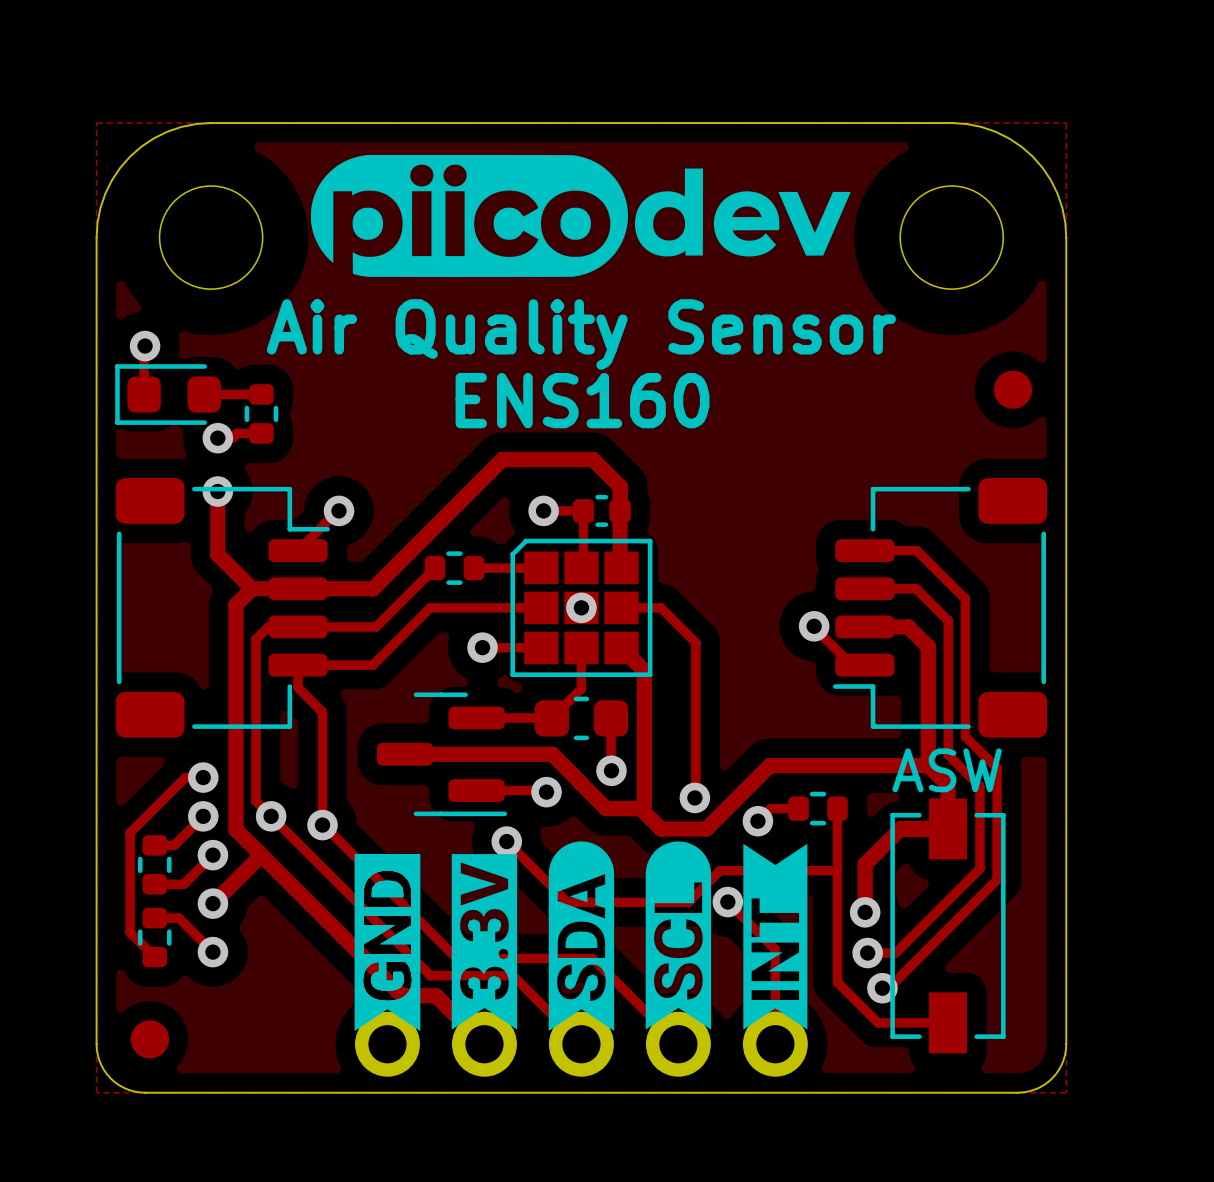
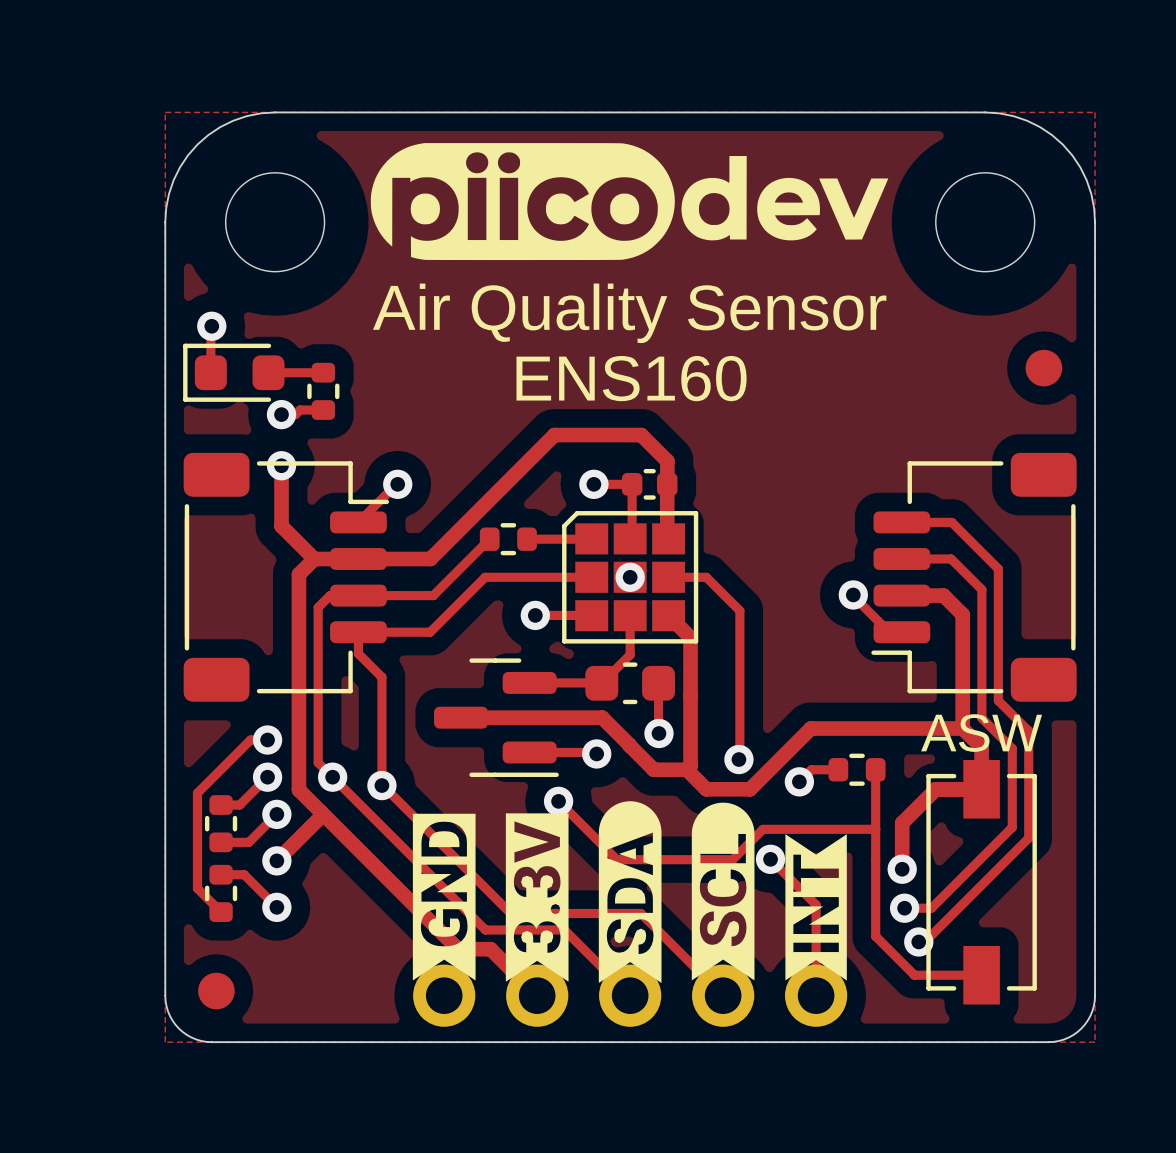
drawing shape: [645, 841, 712, 1030] -> [691, 802, 755, 981]
drawing shape: [743, 843, 808, 1030] -> [785, 834, 847, 981]
drawing shape: [354, 854, 421, 1031] -> [412, 813, 476, 981]

